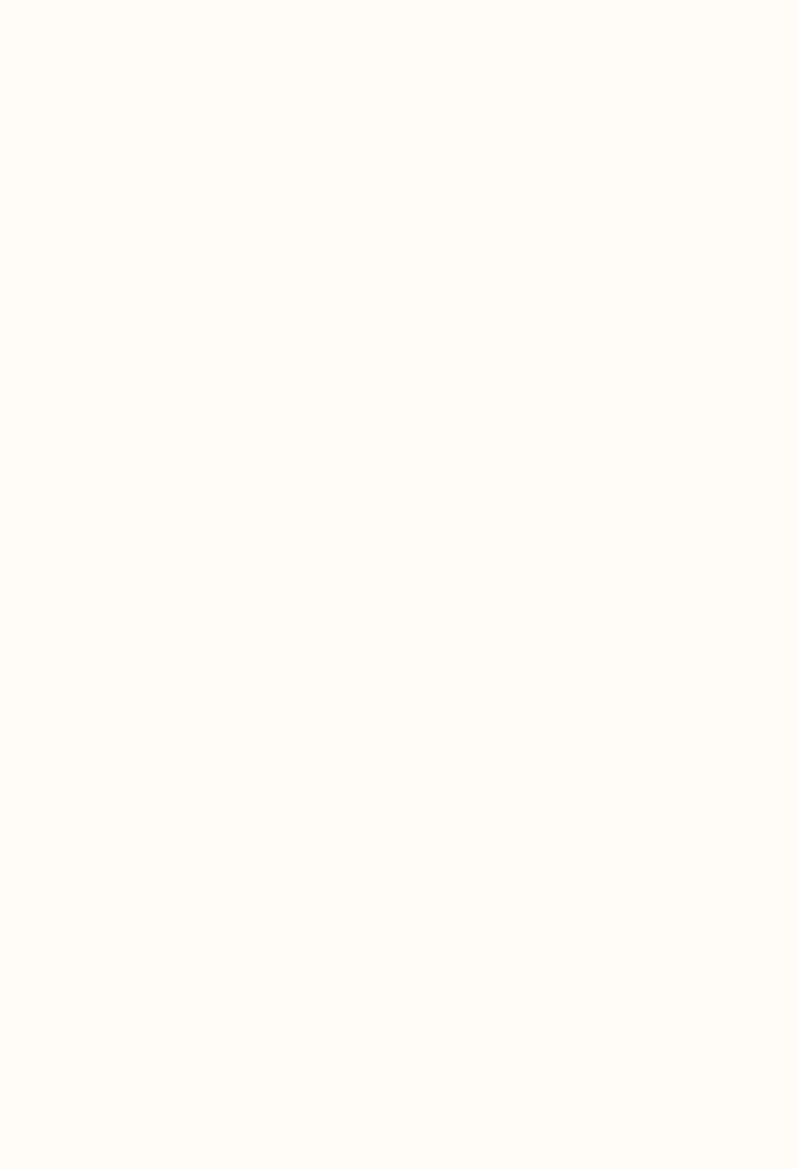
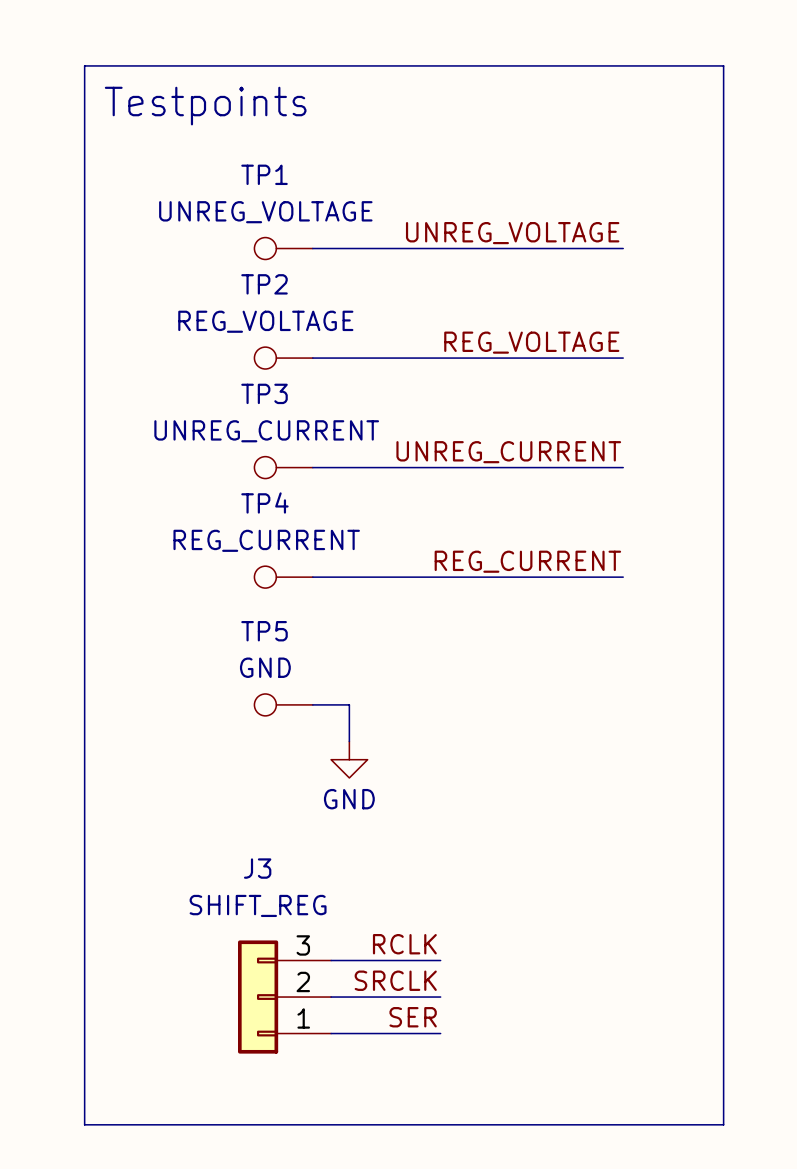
line: none -> (84, 65) (723, 65) (723, 1124) (84, 1124) (84, 65)
text: none -> Testpoints (205, 106)
label: none -> UNREG_VOLTAGE (512, 233)
TP1: none -> UNREG_VOLTAGE (283, 248)
wire: none -> (312, 248) (623, 248)
label: none -> REG_VOLTAGE (531, 342)
TP2: none -> REG_VOLTAGE (283, 358)
wire: none -> (312, 358) (623, 358)
label: none -> UNREG_CURRENT (508, 452)
TP3: none -> UNREG_CURRENT (283, 467)
wire: none -> (312, 467) (623, 467)
label: none -> REG_CURRENT (527, 561)
TP4: none -> REG_CURRENT (283, 577)
wire: none -> (312, 577) (623, 577)
TP5: none -> GND (283, 704)
wire: none -> (312, 704) (349, 704) (349, 741)
power symbol: none -> GND (349, 759)
label: none -> RCLK (404, 944)
wire: none -> (331, 960) (440, 960)
label: none -> SRCLK (395, 980)
J3: none -> SHIFT_REG (284, 997)
wire: none -> (331, 997) (440, 997)
label: none -> SER (413, 1017)
wire: none -> (331, 1033) (440, 1033)

